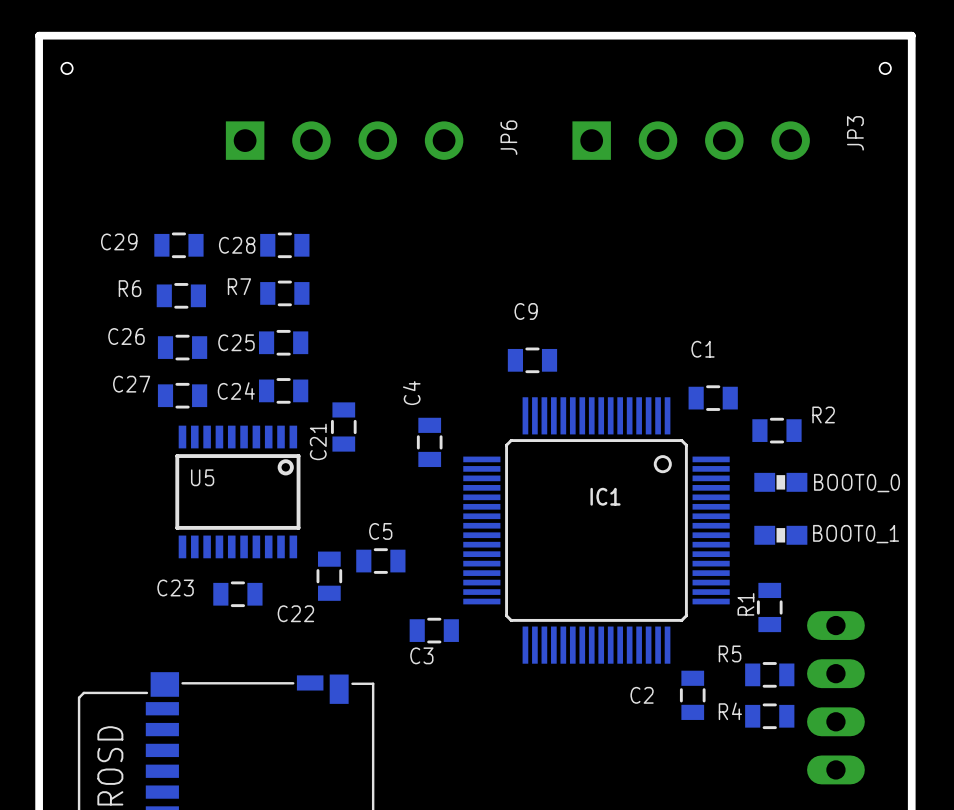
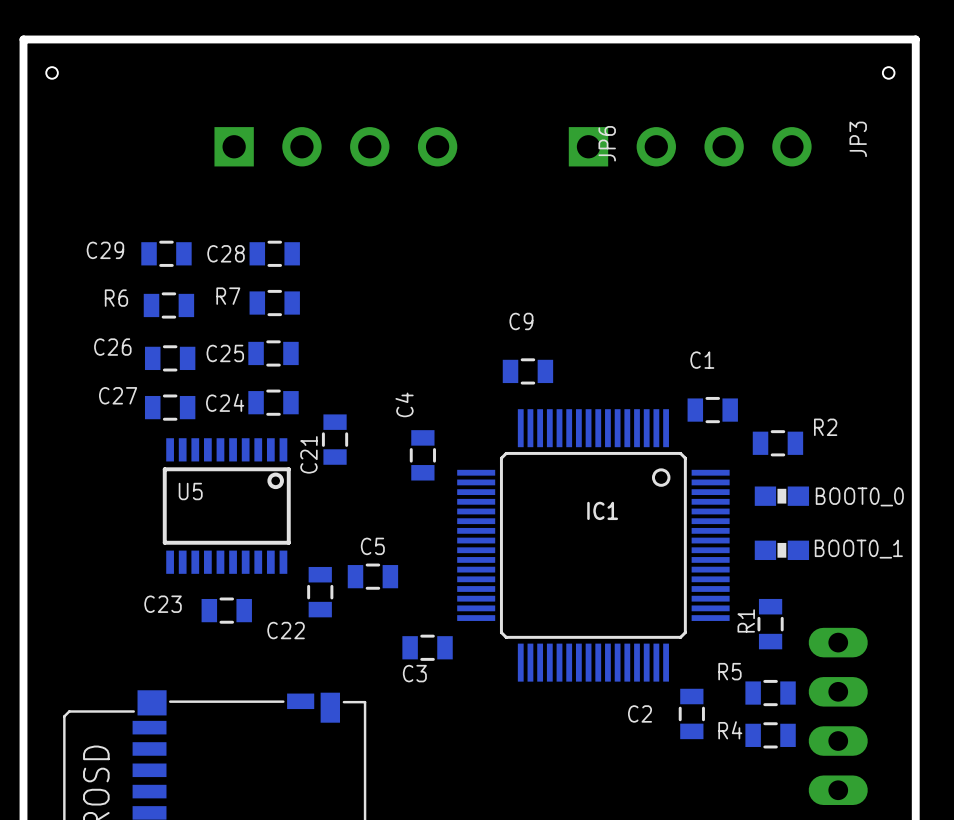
JP6 name position: JP6 (508, 137) -> JP6 (607, 143)

